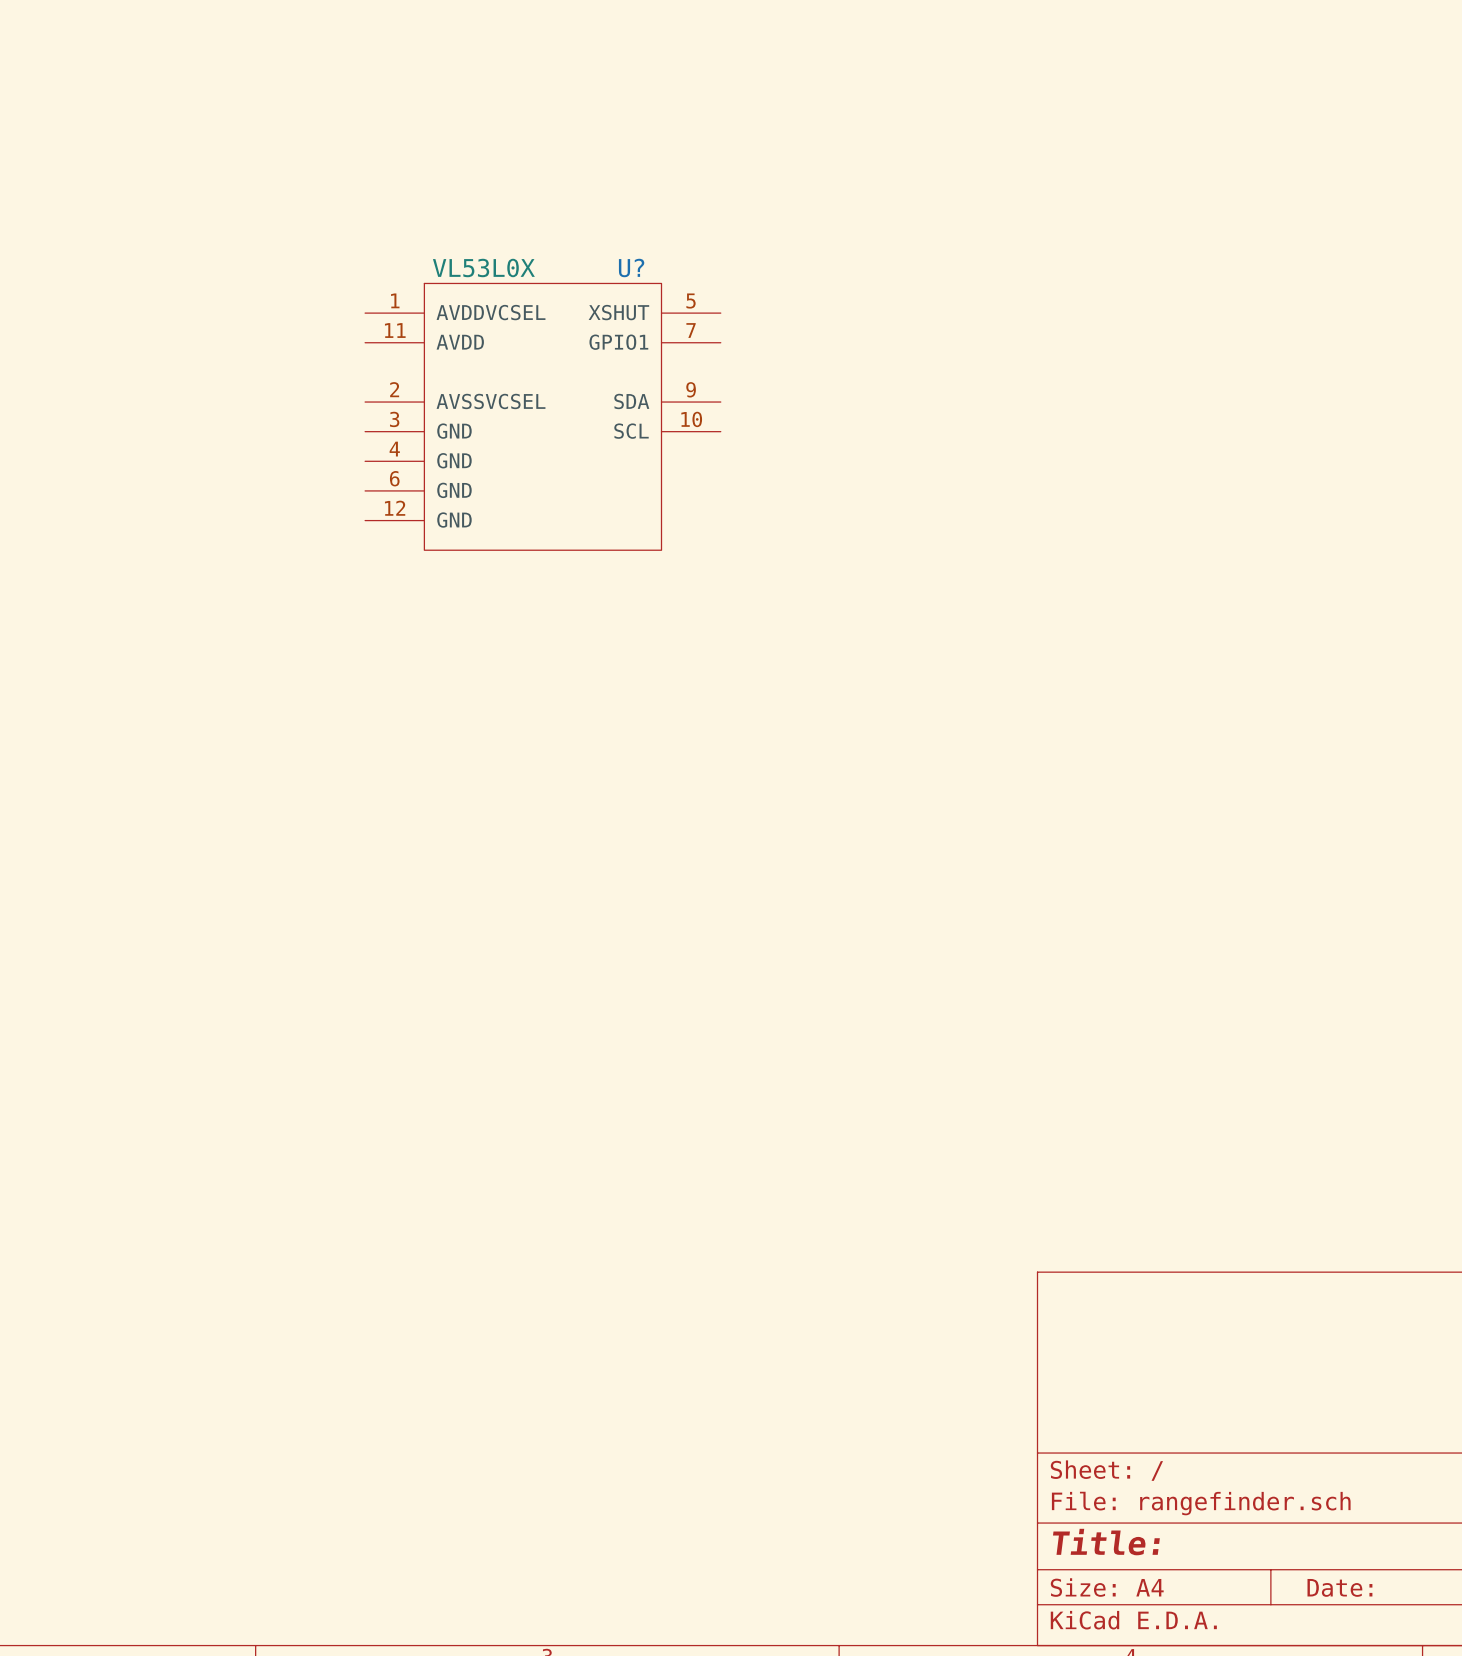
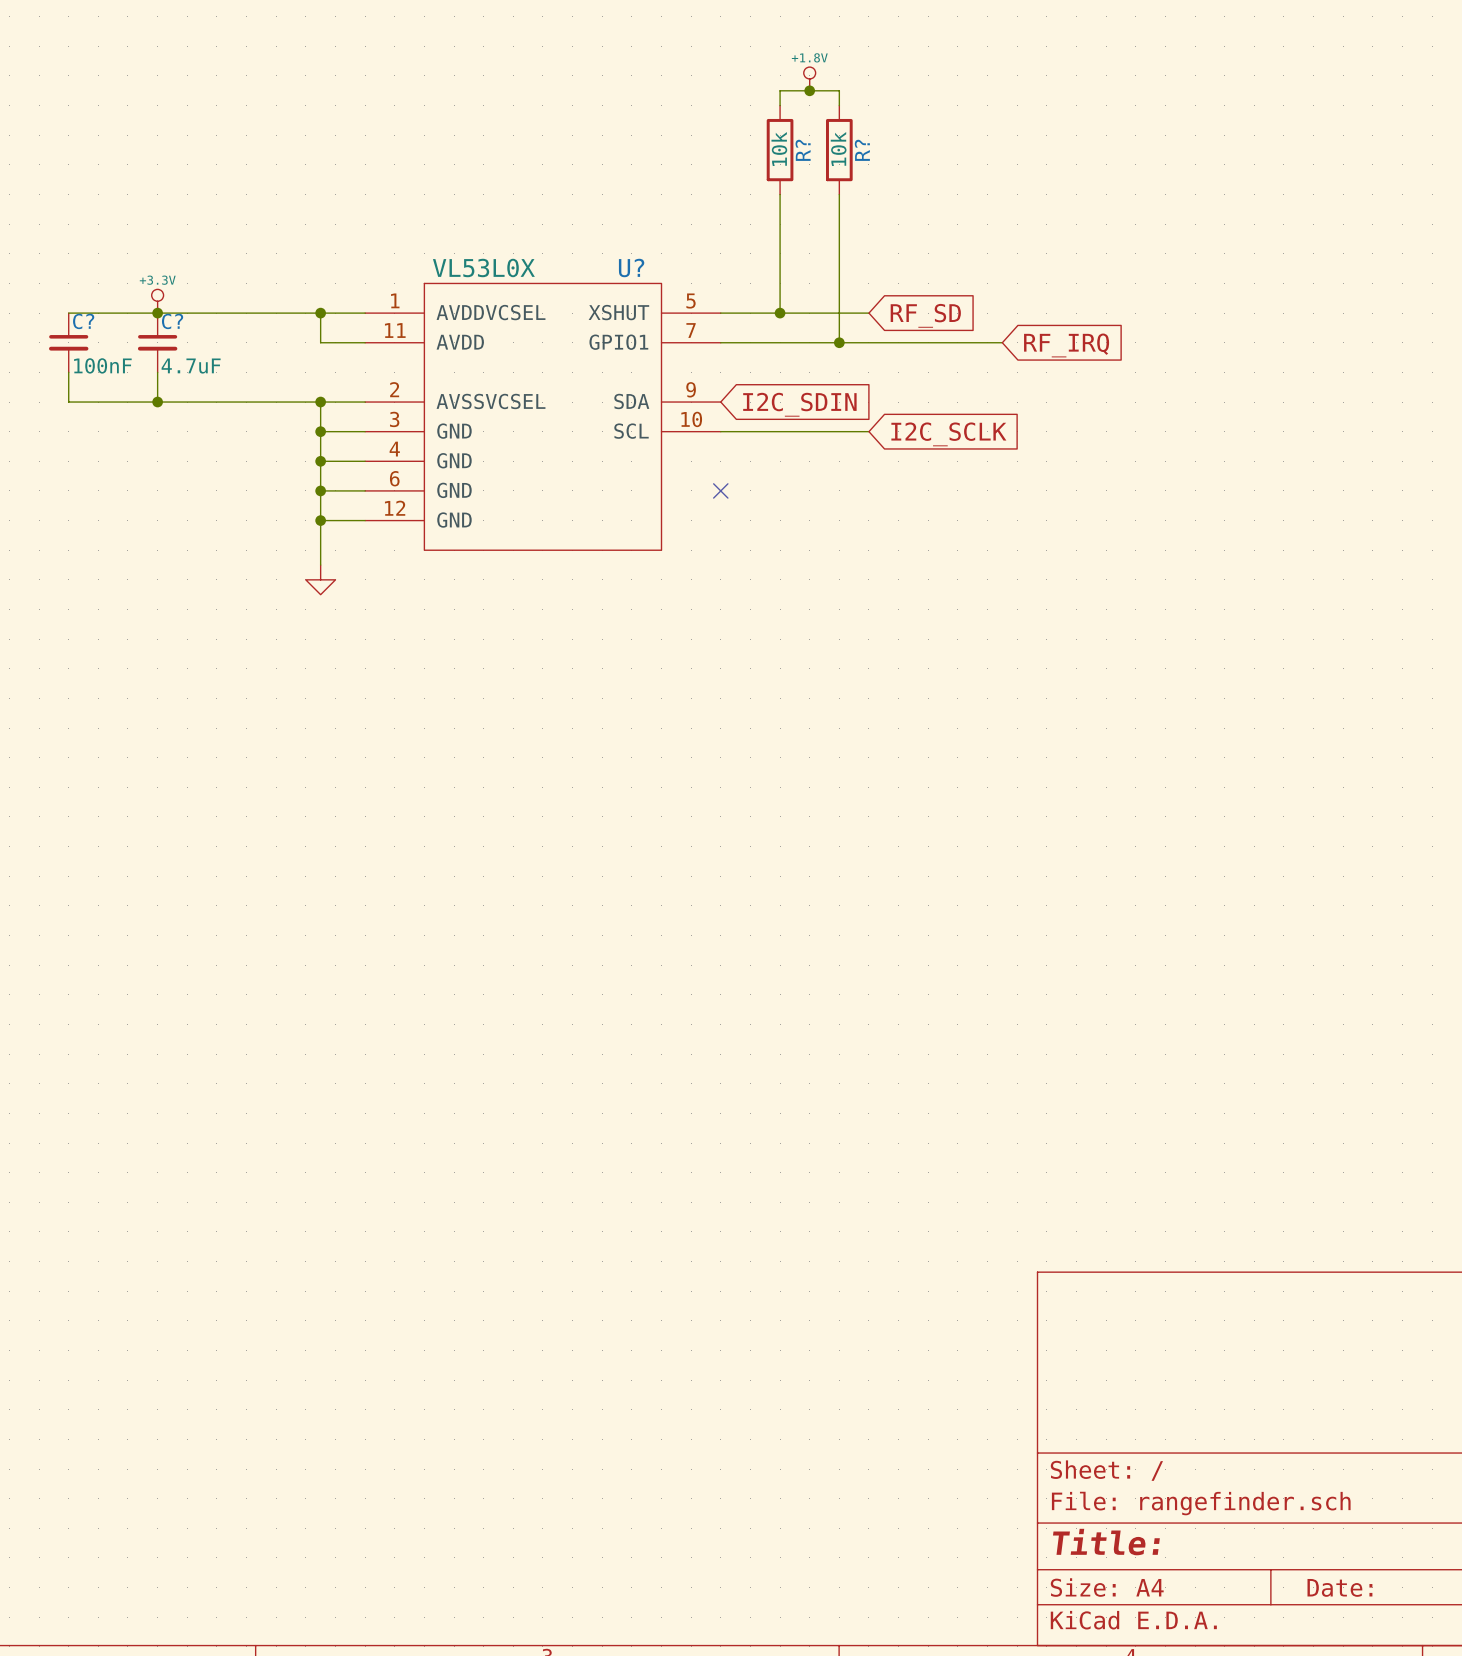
power symbol: none -> +1.8V (809, 78)
junction: none -> (809, 90)
wire: none -> (780, 105) (780, 90) (839, 90) (839, 105)
R?: none -> 10k (780, 150)
R?: none -> 10k (839, 150)
wire: none -> (780, 194) (780, 313)
wire: none -> (839, 194) (839, 342)
power symbol: none -> +3.3V (157, 301)
wire: none -> (68, 313) (365, 313)
junction: none -> (157, 313)
wire: none -> (320, 313) (320, 342) (365, 342)
junction: none -> (320, 313)
wire: none -> (720, 313) (868, 313)
junction: none -> (780, 313)
global label: none -> RF_SD (925, 315)
C?: none -> 100nF (68, 342)
C?: none -> 4.7uF (157, 342)
wire: none -> (720, 342) (1002, 342)
junction: none -> (839, 342)
global label: none -> RF_IRQ (1066, 345)
wire: none -> (68, 372) (68, 402) (365, 402)
wire: none -> (157, 372) (157, 402)
junction: none -> (157, 402)
wire: none -> (320, 402) (320, 565)
junction: none -> (320, 402)
global label: none -> I2C_SDIN (799, 404)
wire: none -> (320, 431) (365, 431)
junction: none -> (320, 431)
wire: none -> (720, 431) (868, 431)
global label: none -> I2C_SCLK (948, 434)
wire: none -> (320, 461) (365, 461)
junction: none -> (320, 461)
wire: none -> (320, 490) (365, 490)
junction: none -> (320, 490)
no-connect mark: none -> (720, 490)
wire: none -> (320, 520) (365, 520)
junction: none -> (320, 520)
power symbol: none -> (320, 579)

